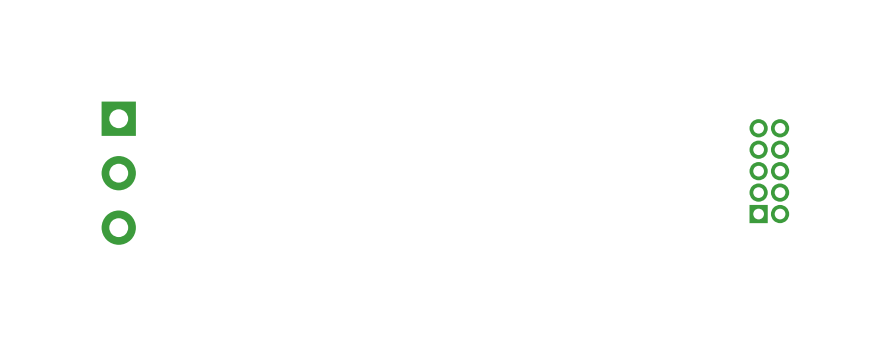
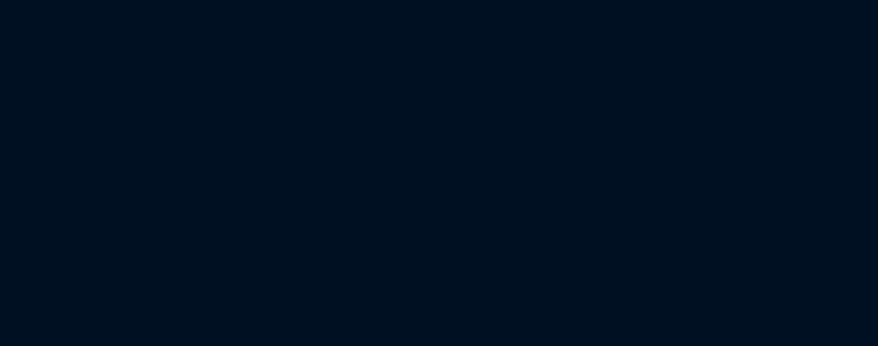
part: (769, 171) -> none
part: (118, 173) -> none

